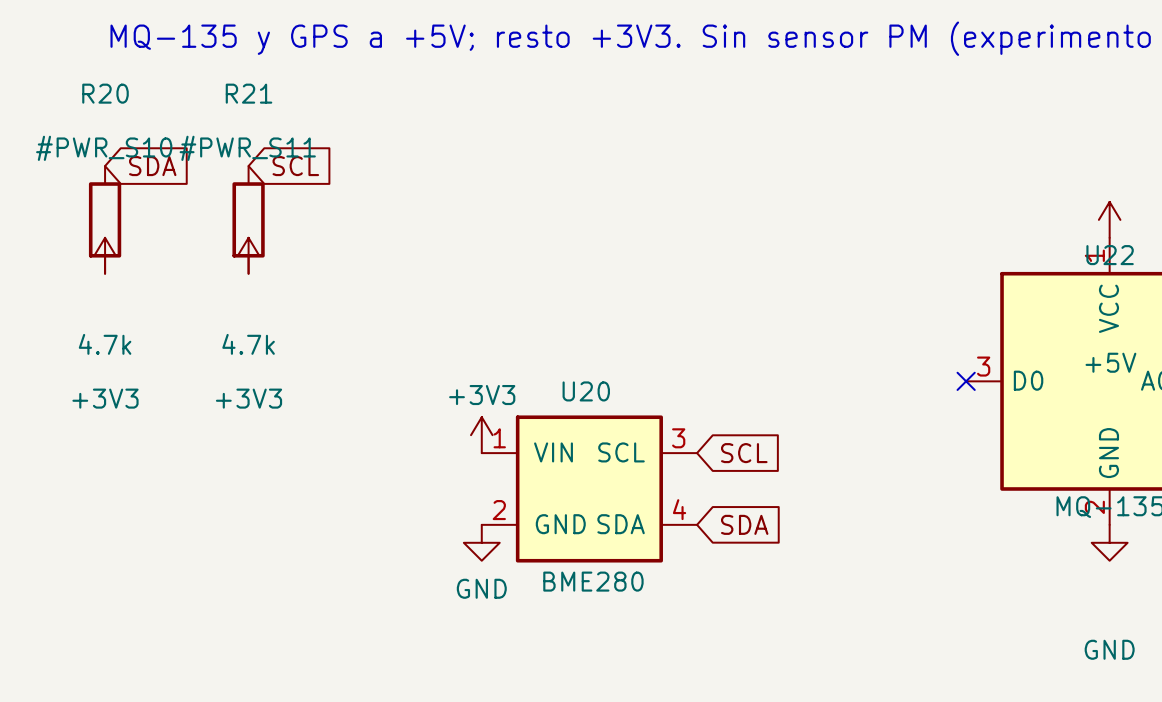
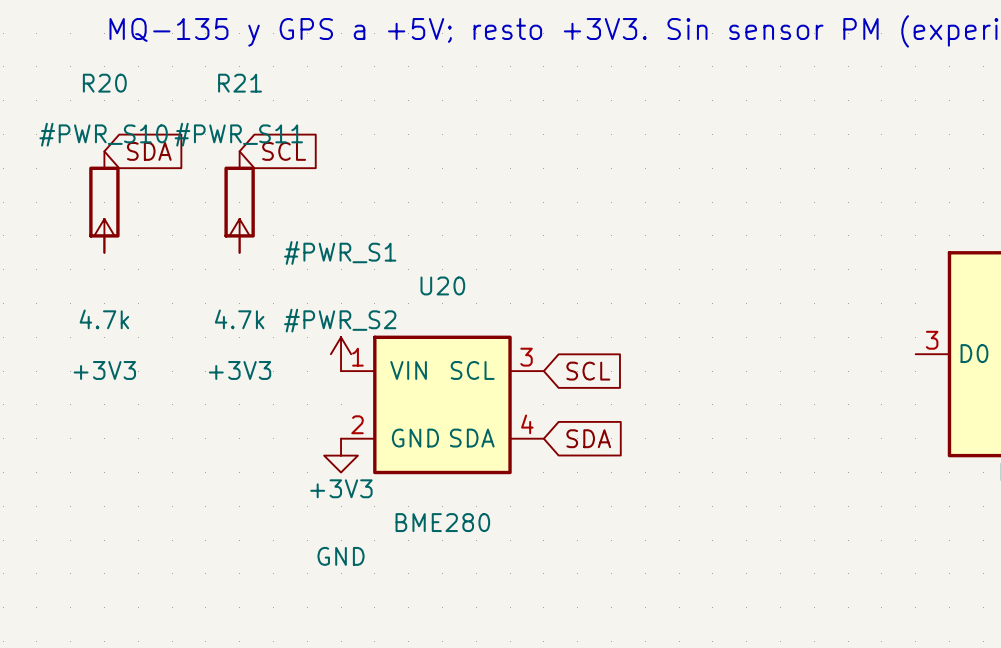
#PWR_S1: none -> +3V3 (341, 354)
no-connect mark: (966, 381) -> none
U20 name position: U20 (586, 391) -> U20 (442, 285)
power symbol: +3V3 (481, 435) -> none
global label position: SCL (744, 453) -> SCL (588, 371)
#PWR_S2: none -> GND (341, 455)
U20 position: (589, 488) -> (442, 404)
global label position: SDA (744, 524) -> SDA (588, 438)
power symbol: GND (481, 542) -> none
U20 value position: BME280 (593, 581) -> BME280 (442, 522)

